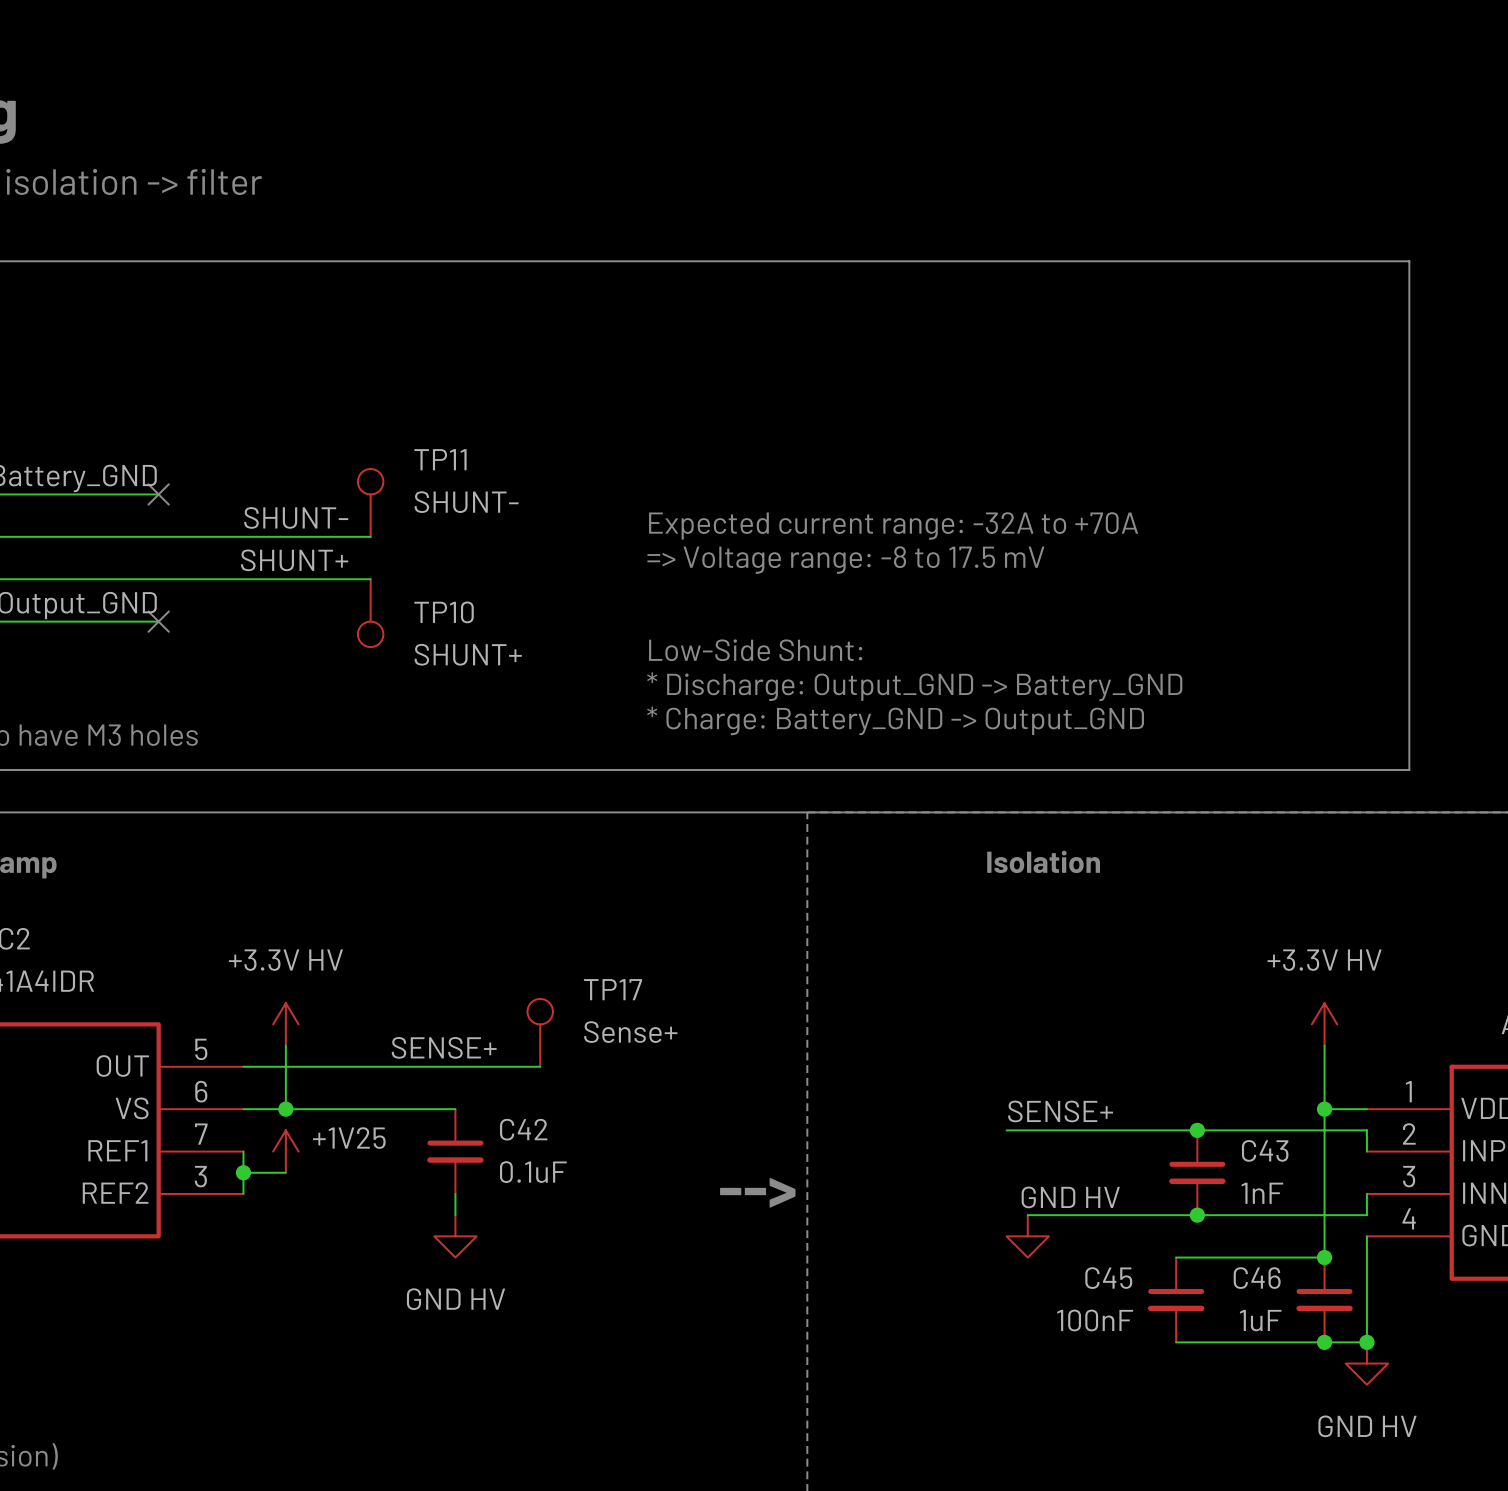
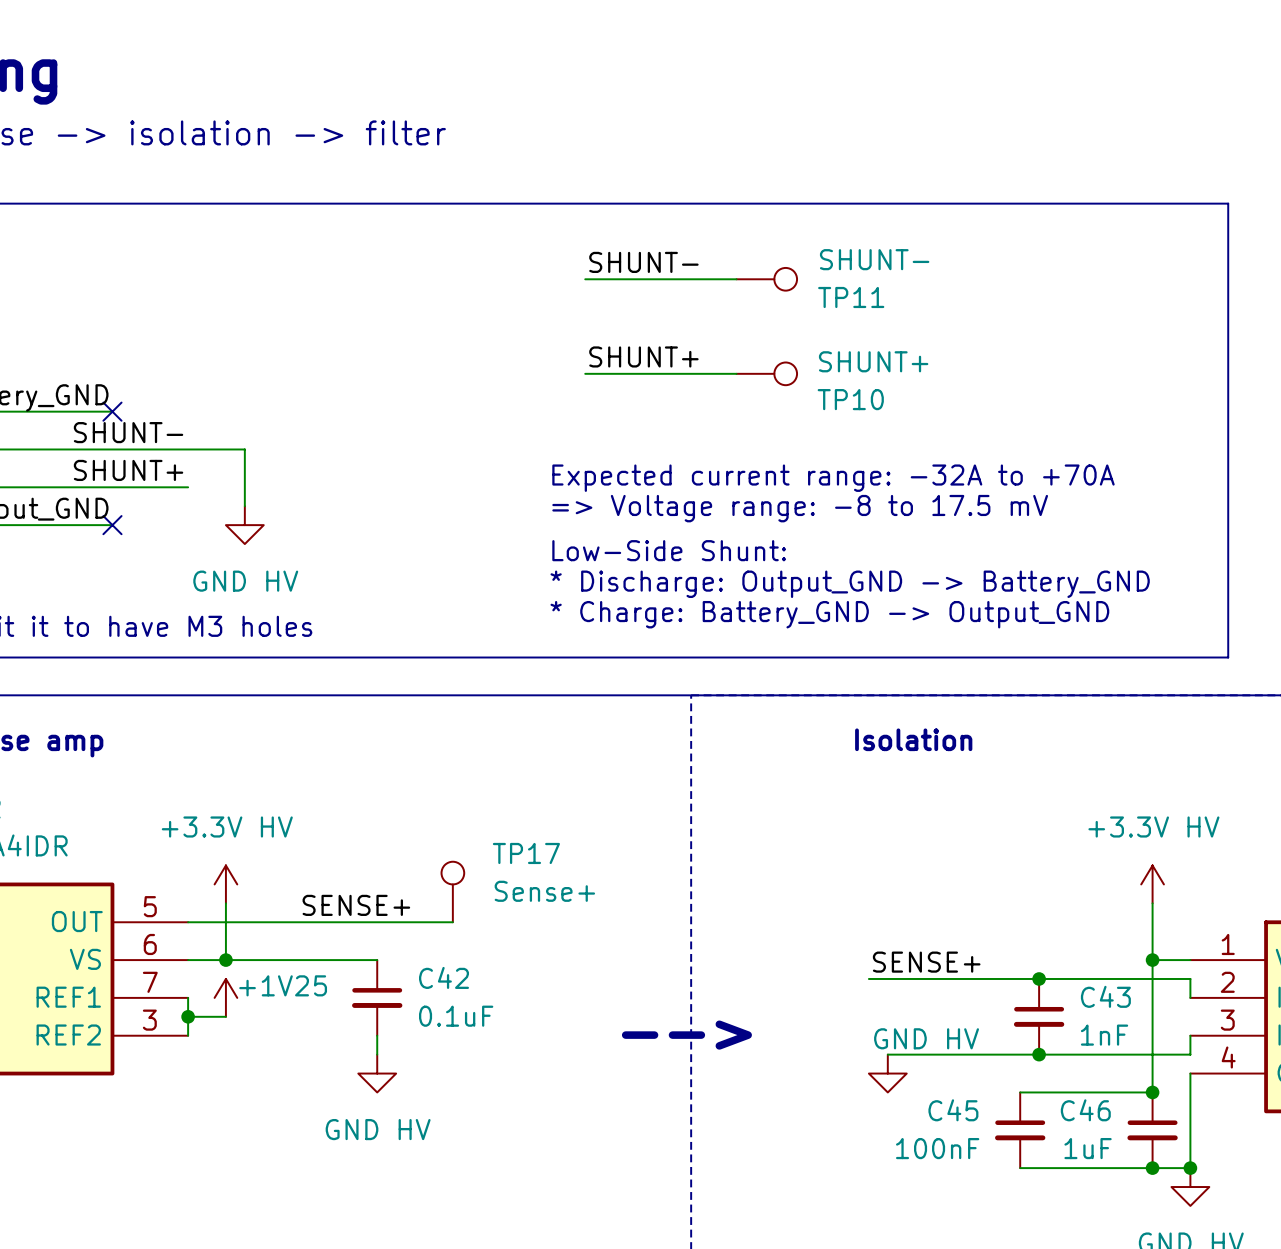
label: none -> SHUNT- (643, 262)
wire: none -> (585, 279) (736, 279)
label: none -> SHUNT+ (643, 356)
wire: none -> (585, 373) (736, 373)
TP11 name position: TP11 (440, 459) -> TP11 (851, 297)
TP11 rotation: 0° (370, 481) -> 90° clockwise (785, 279)
TP11 position: (370, 502) -> (766, 279)
label position: SHUNT- (296, 517) -> SHUNT- (128, 432)
text position: Expected current range: -32A to +70A (893, 525) -> Expected current range: -32A to +70A (833, 478)
wire: (307, 536) (370, 536) -> (244, 449) (244, 506)
label position: SHUNT+ (294, 560) -> SHUNT+ (128, 470)
text position: => Voltage range: -8 to 17.5 mV (845, 560) -> => Voltage range: -8 to 17.5 mV (800, 508)
wire: (243, 579) (370, 579) -> none
TP10 position: (370, 613) -> (766, 373)
power symbol: none -> GND HV (244, 525)
TP10 rotation: 0° (370, 634) -> 90° counterclockwise (785, 373)
TP10 value position: SHUNT+ (468, 654) -> SHUNT+ (873, 361)

